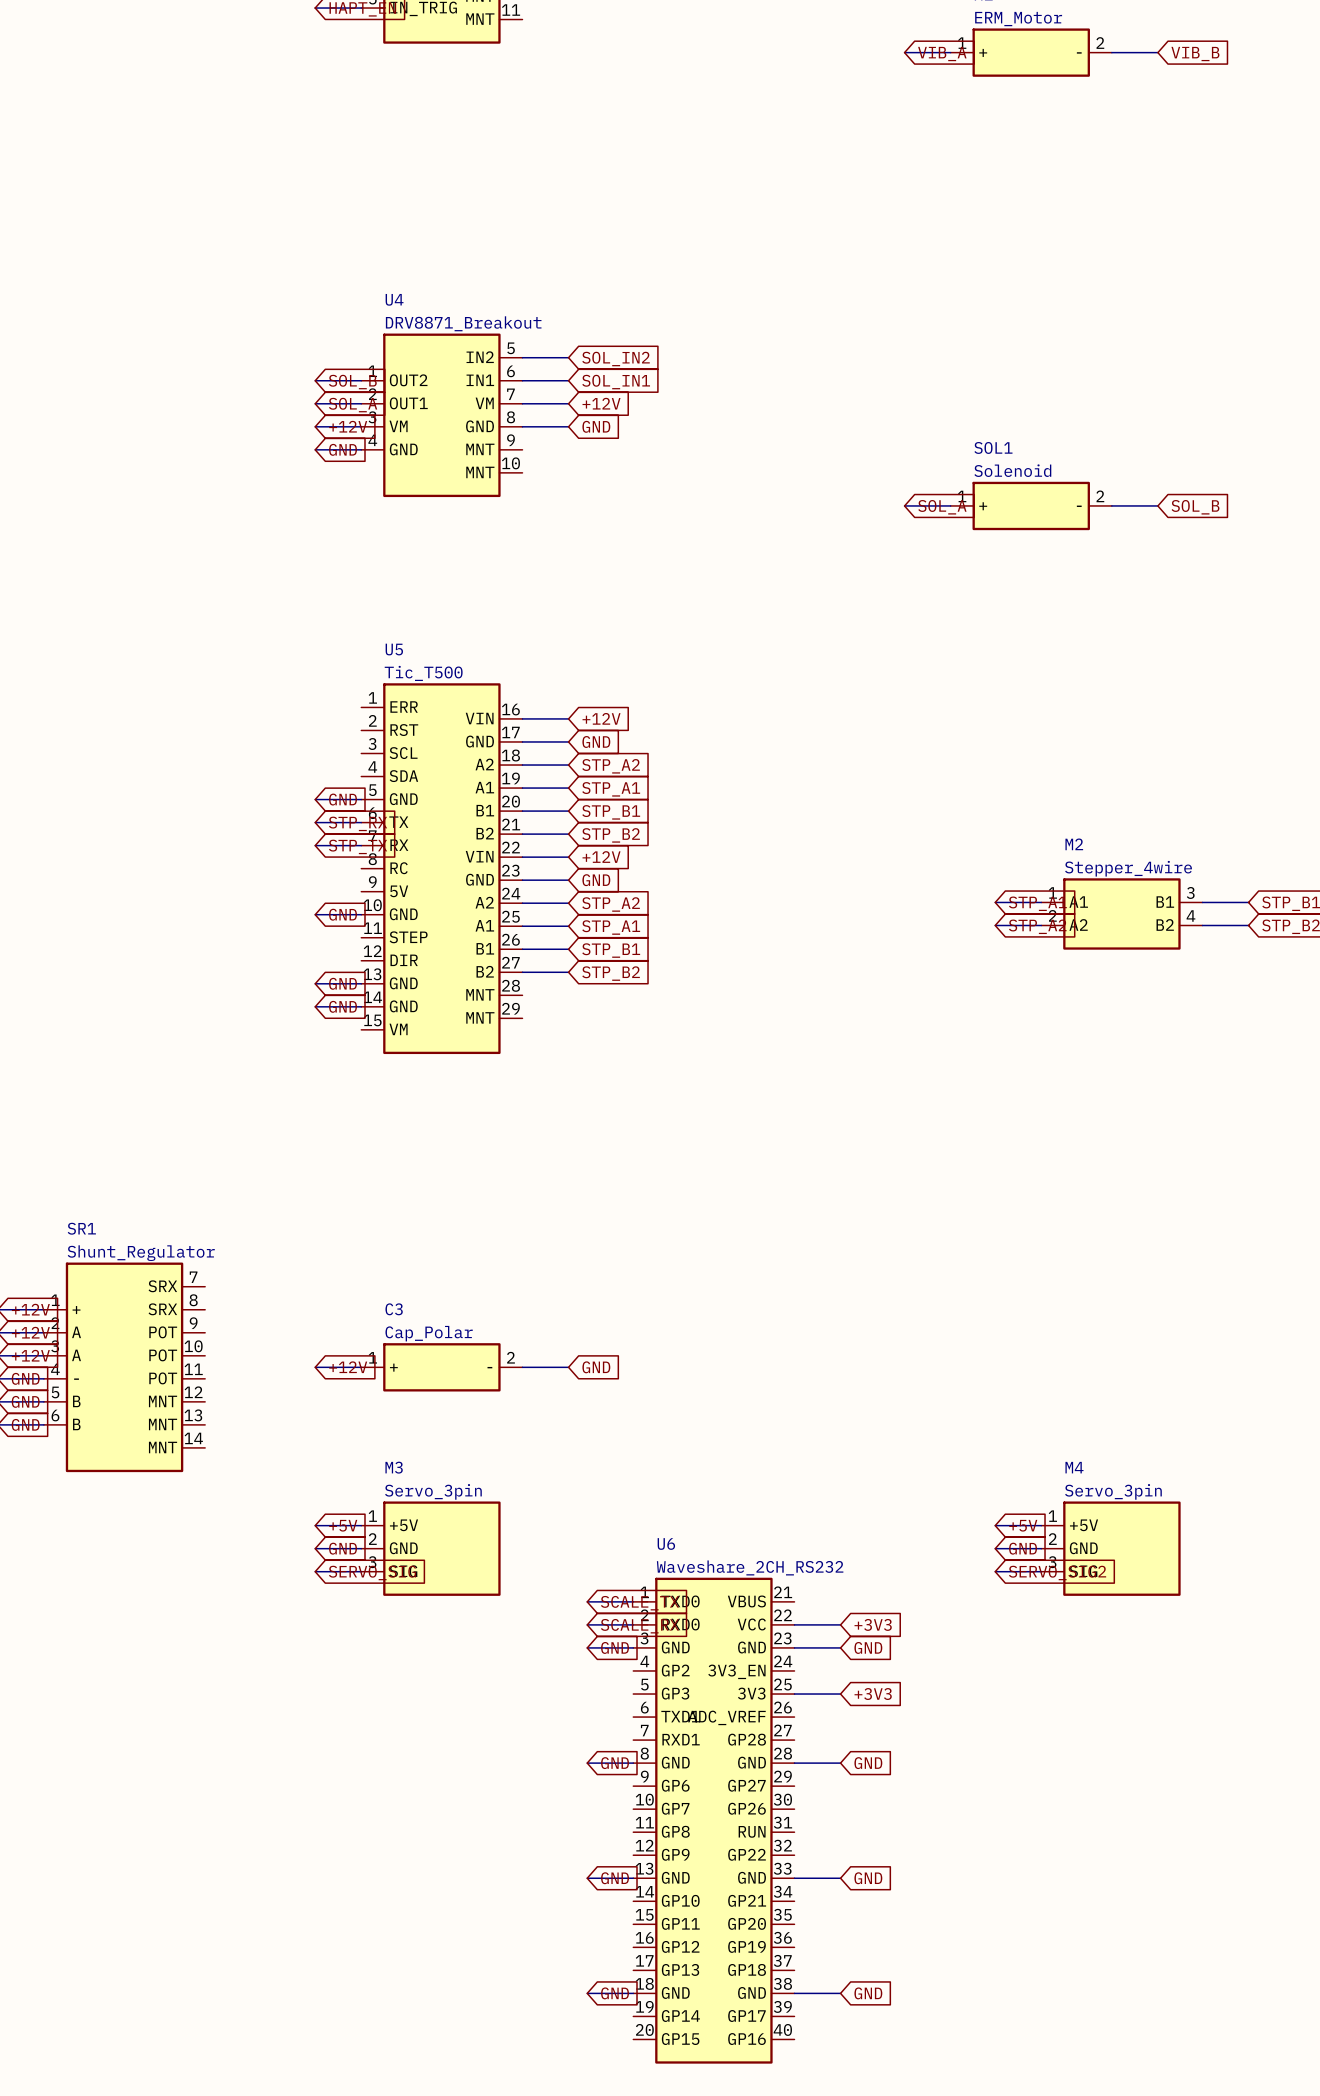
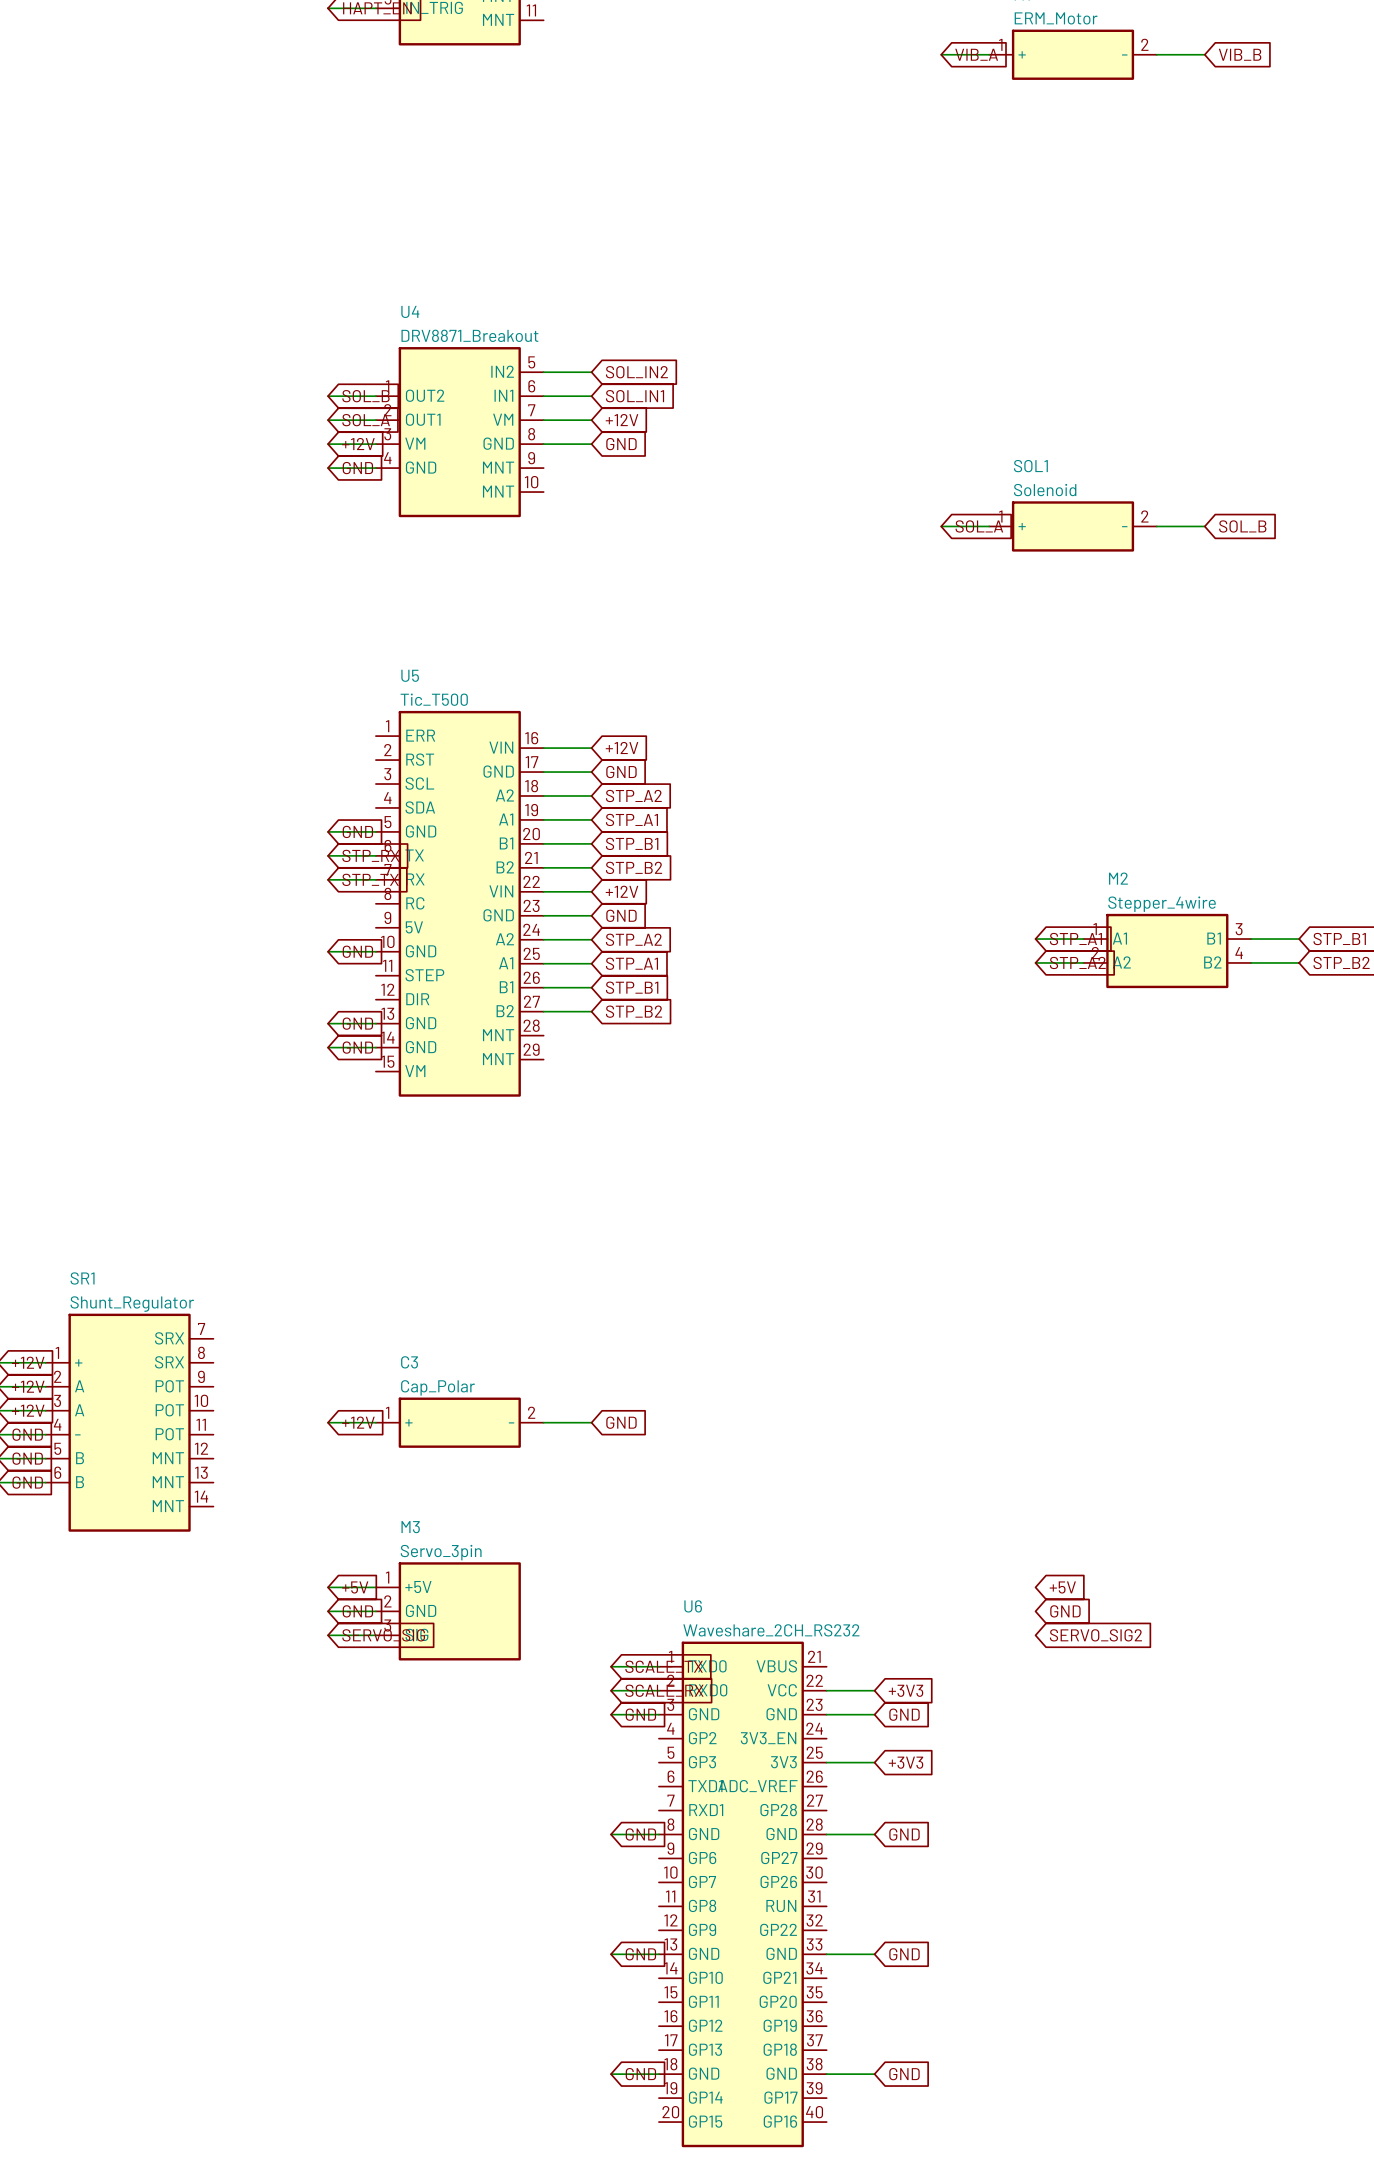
wire: (995, 1525) (1041, 1525) -> none
wire: (995, 1548) (1041, 1548) -> none
M4: Servo_3pin (1110, 1548) -> none
wire: (995, 1571) (1041, 1571) -> none

